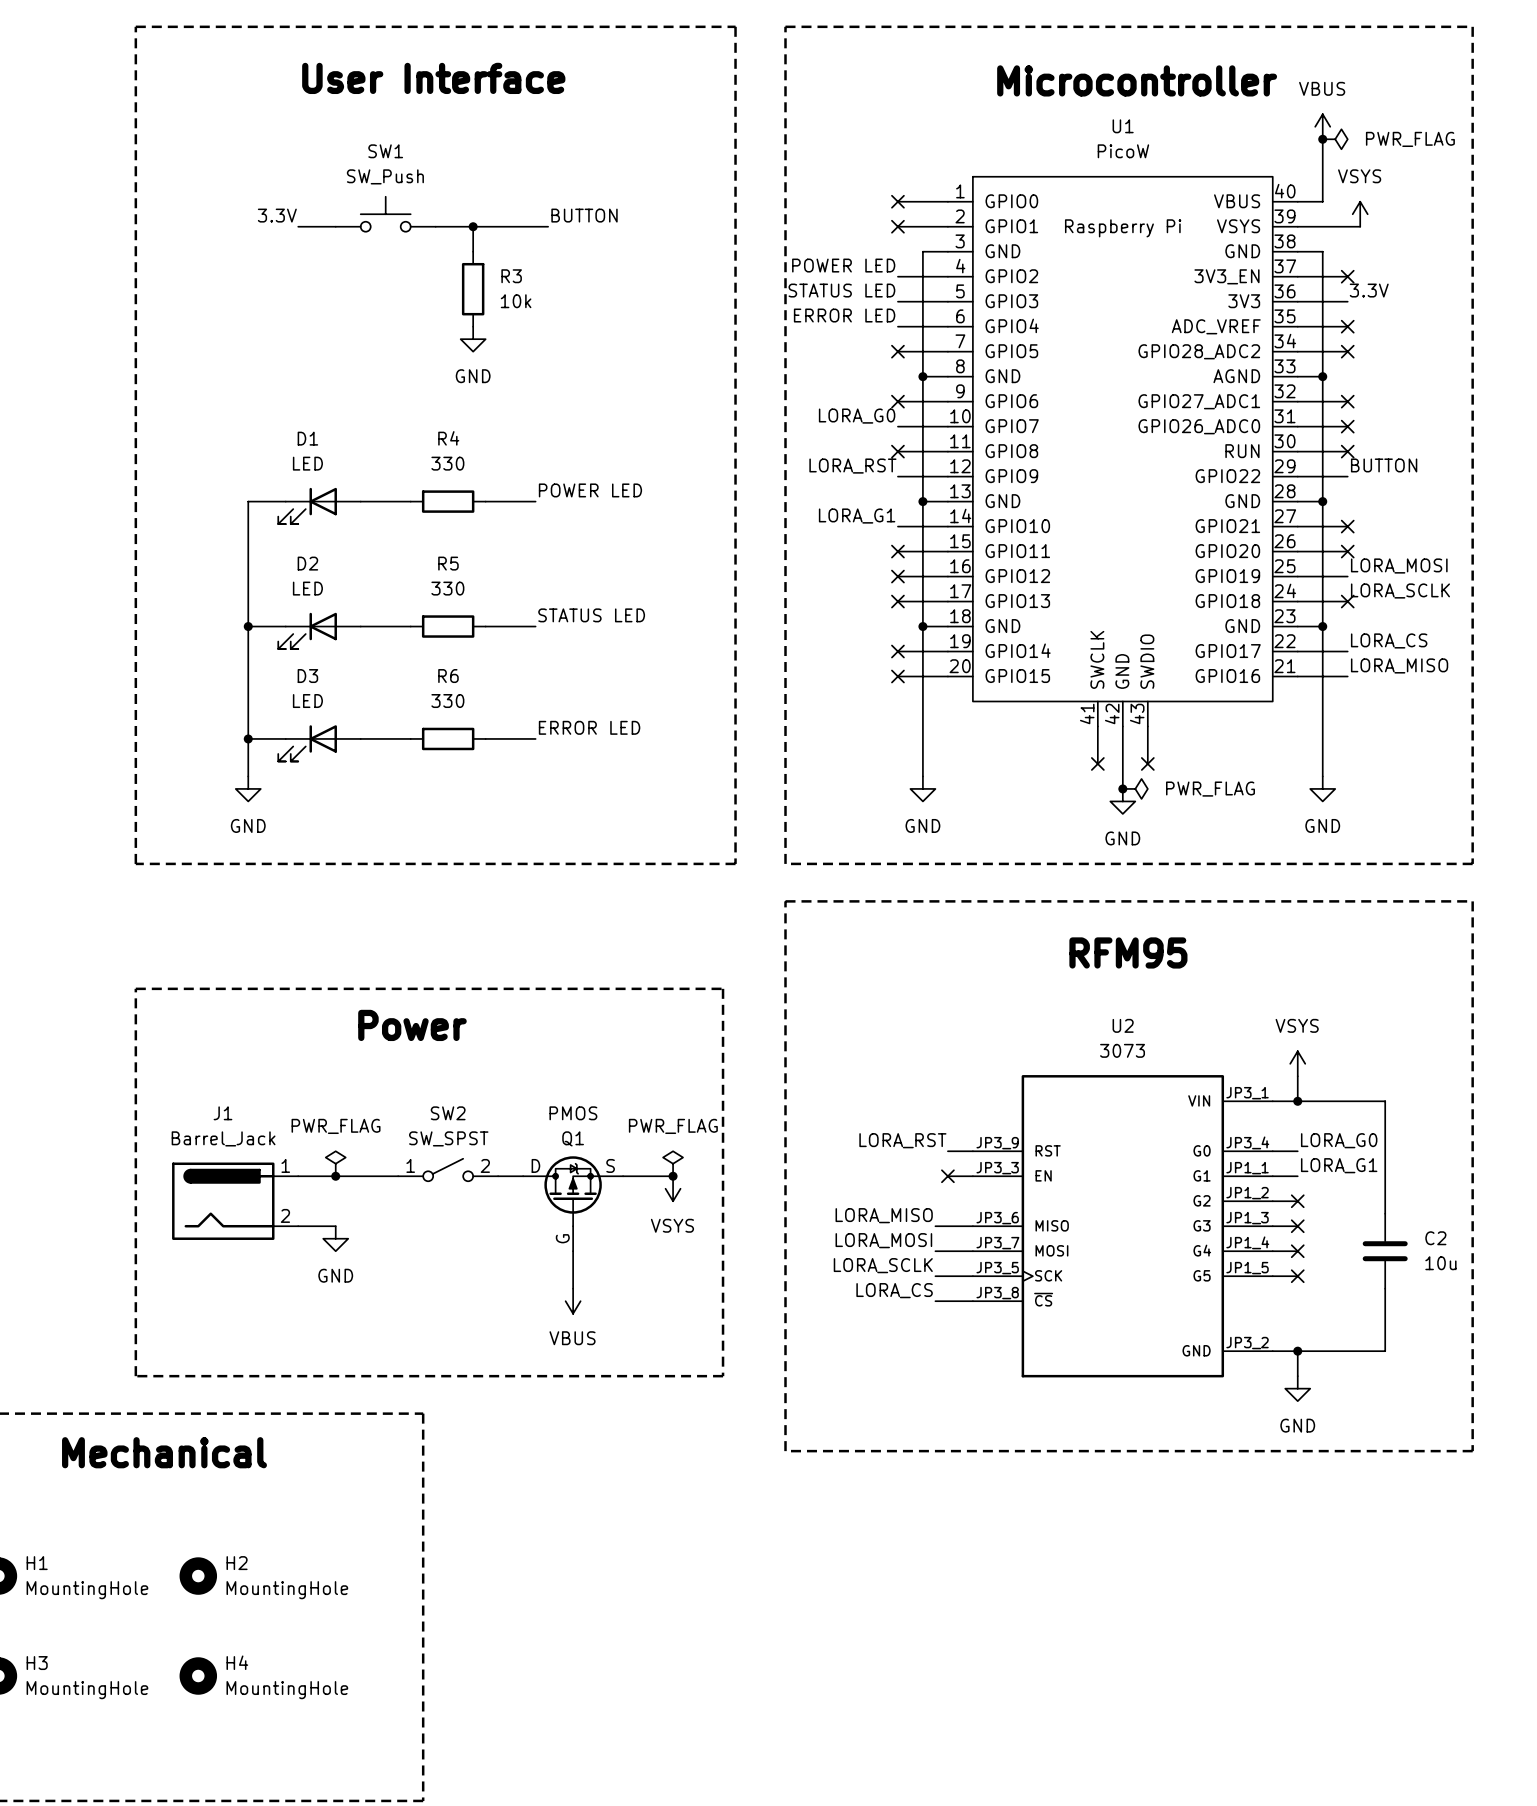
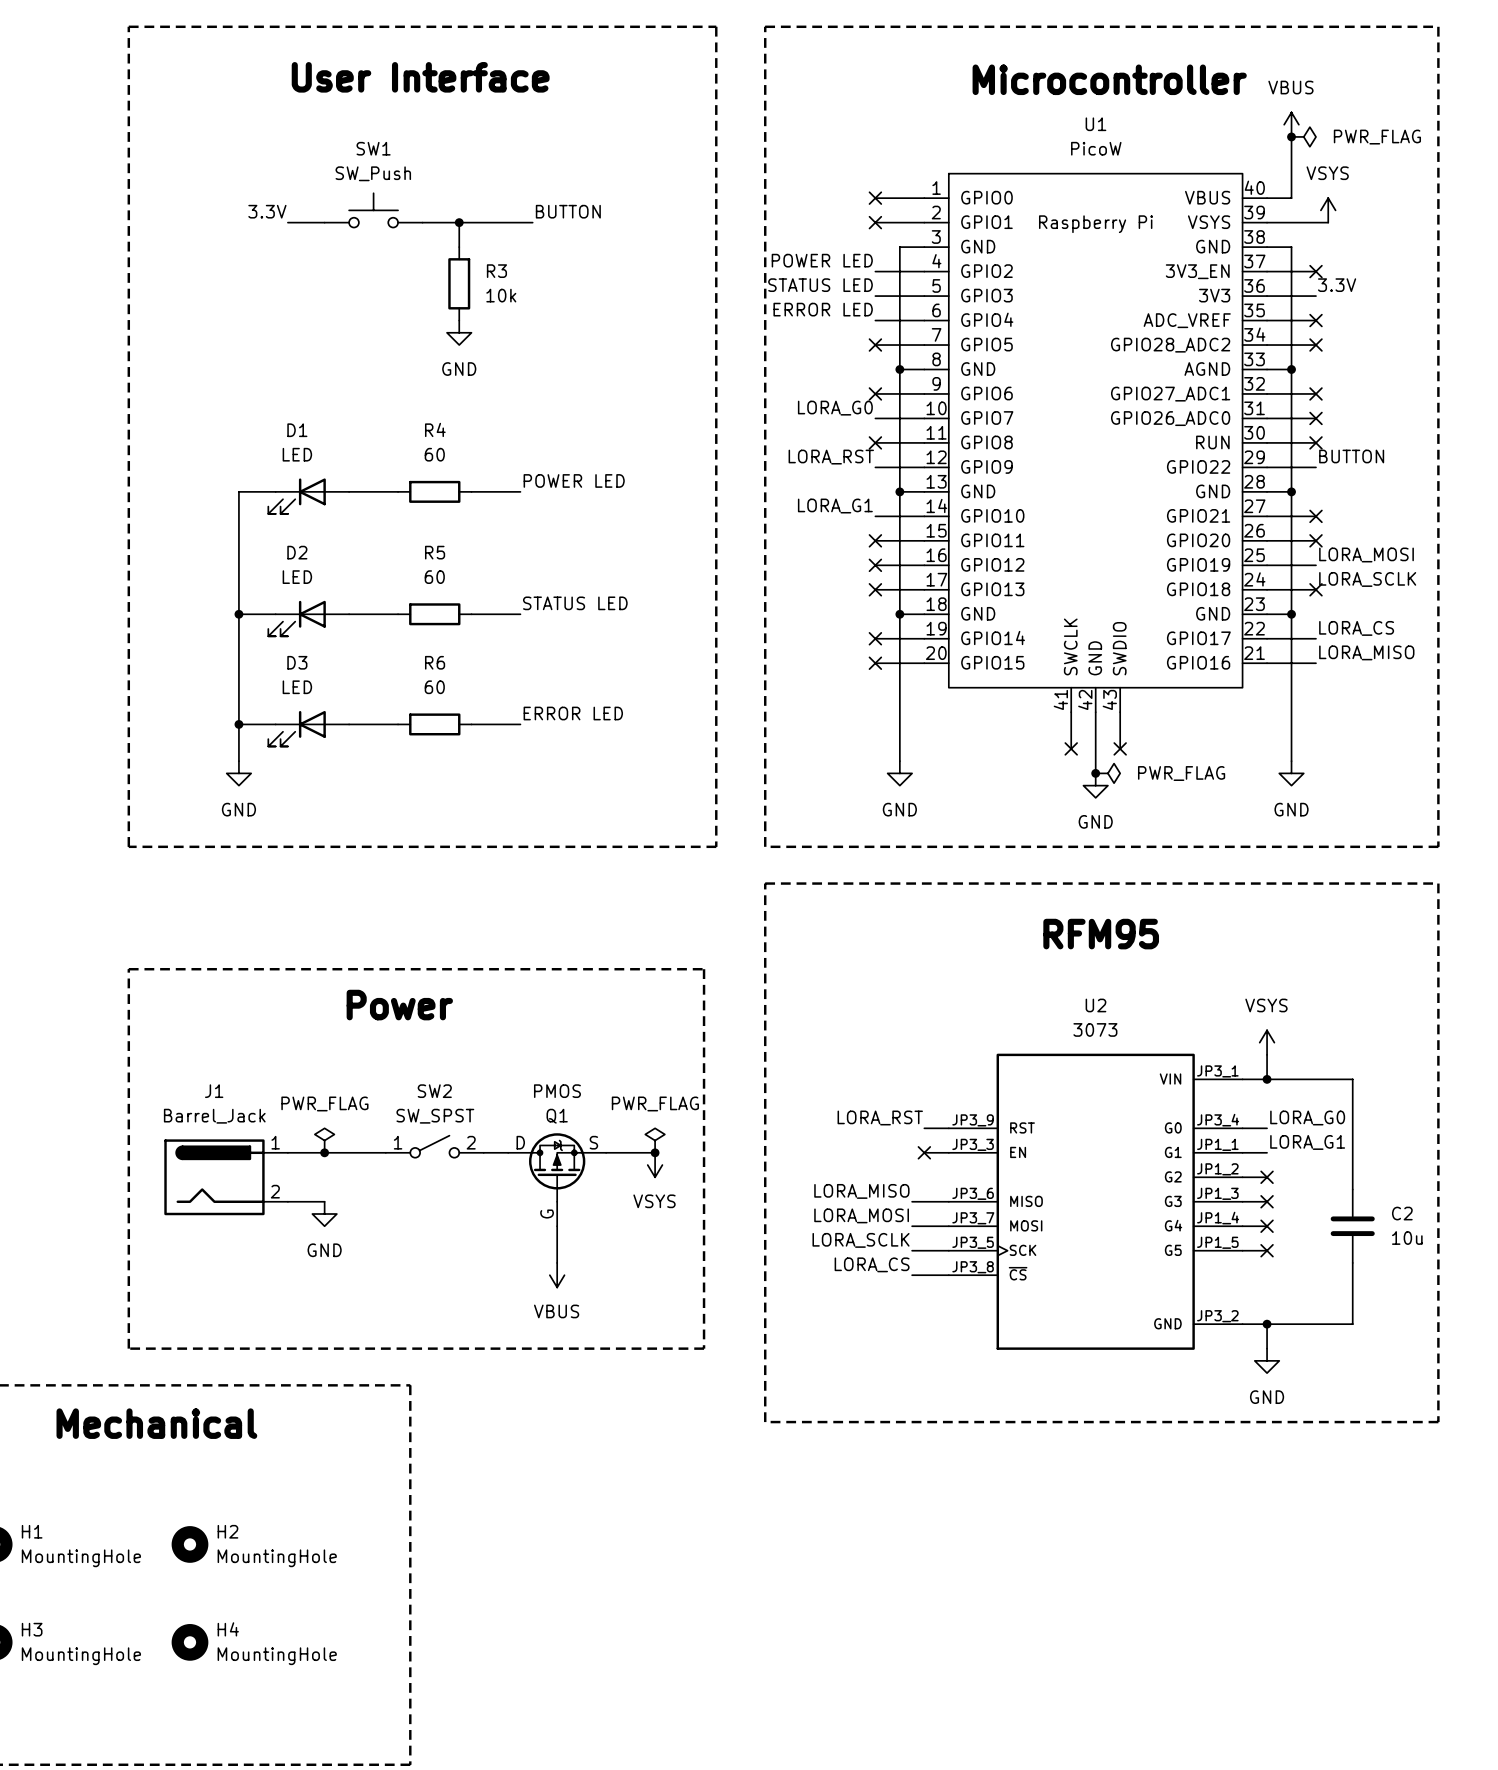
R4 value: 330 (447, 463) -> 60 (434, 454)
R5 value: 330 (447, 588) -> 60 (434, 577)
R6 value: 330 (447, 701) -> 60 (434, 687)

